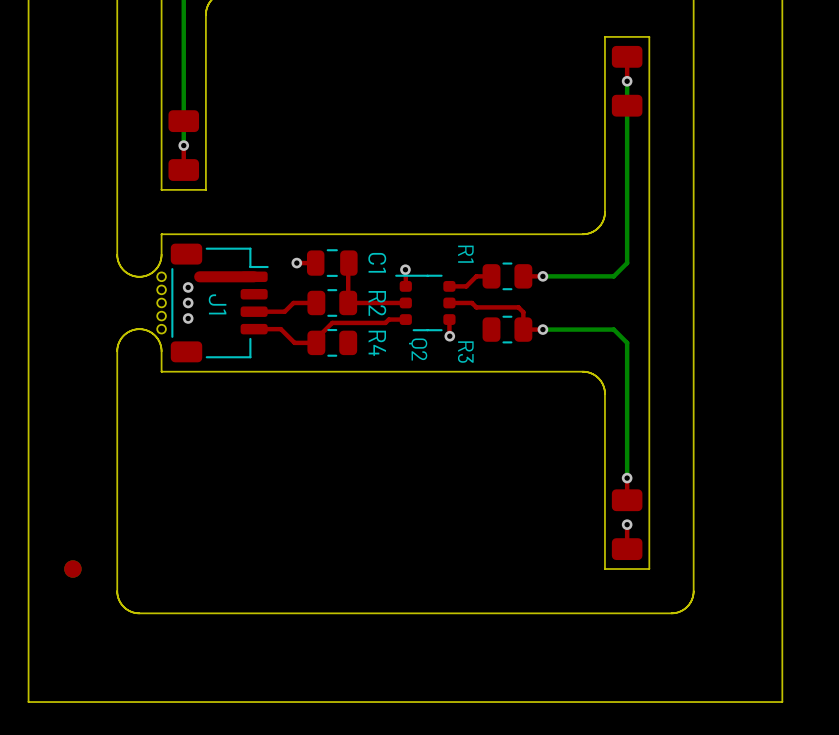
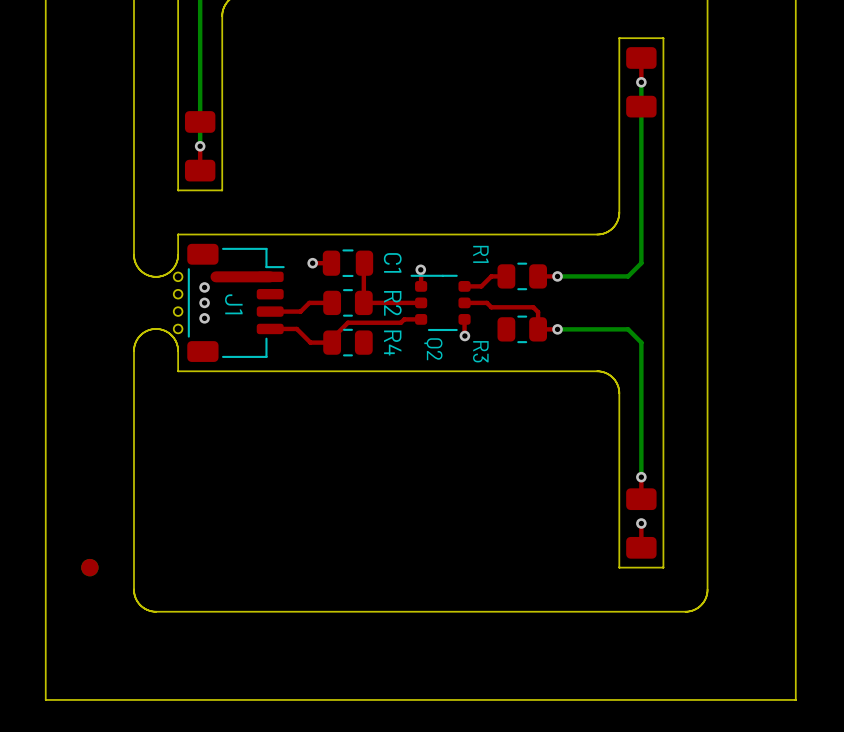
part: (161, 289) -> none
part: none -> (178, 294)
part: (161, 302) -> none
part: none -> (178, 311)
part: (161, 316) -> none

